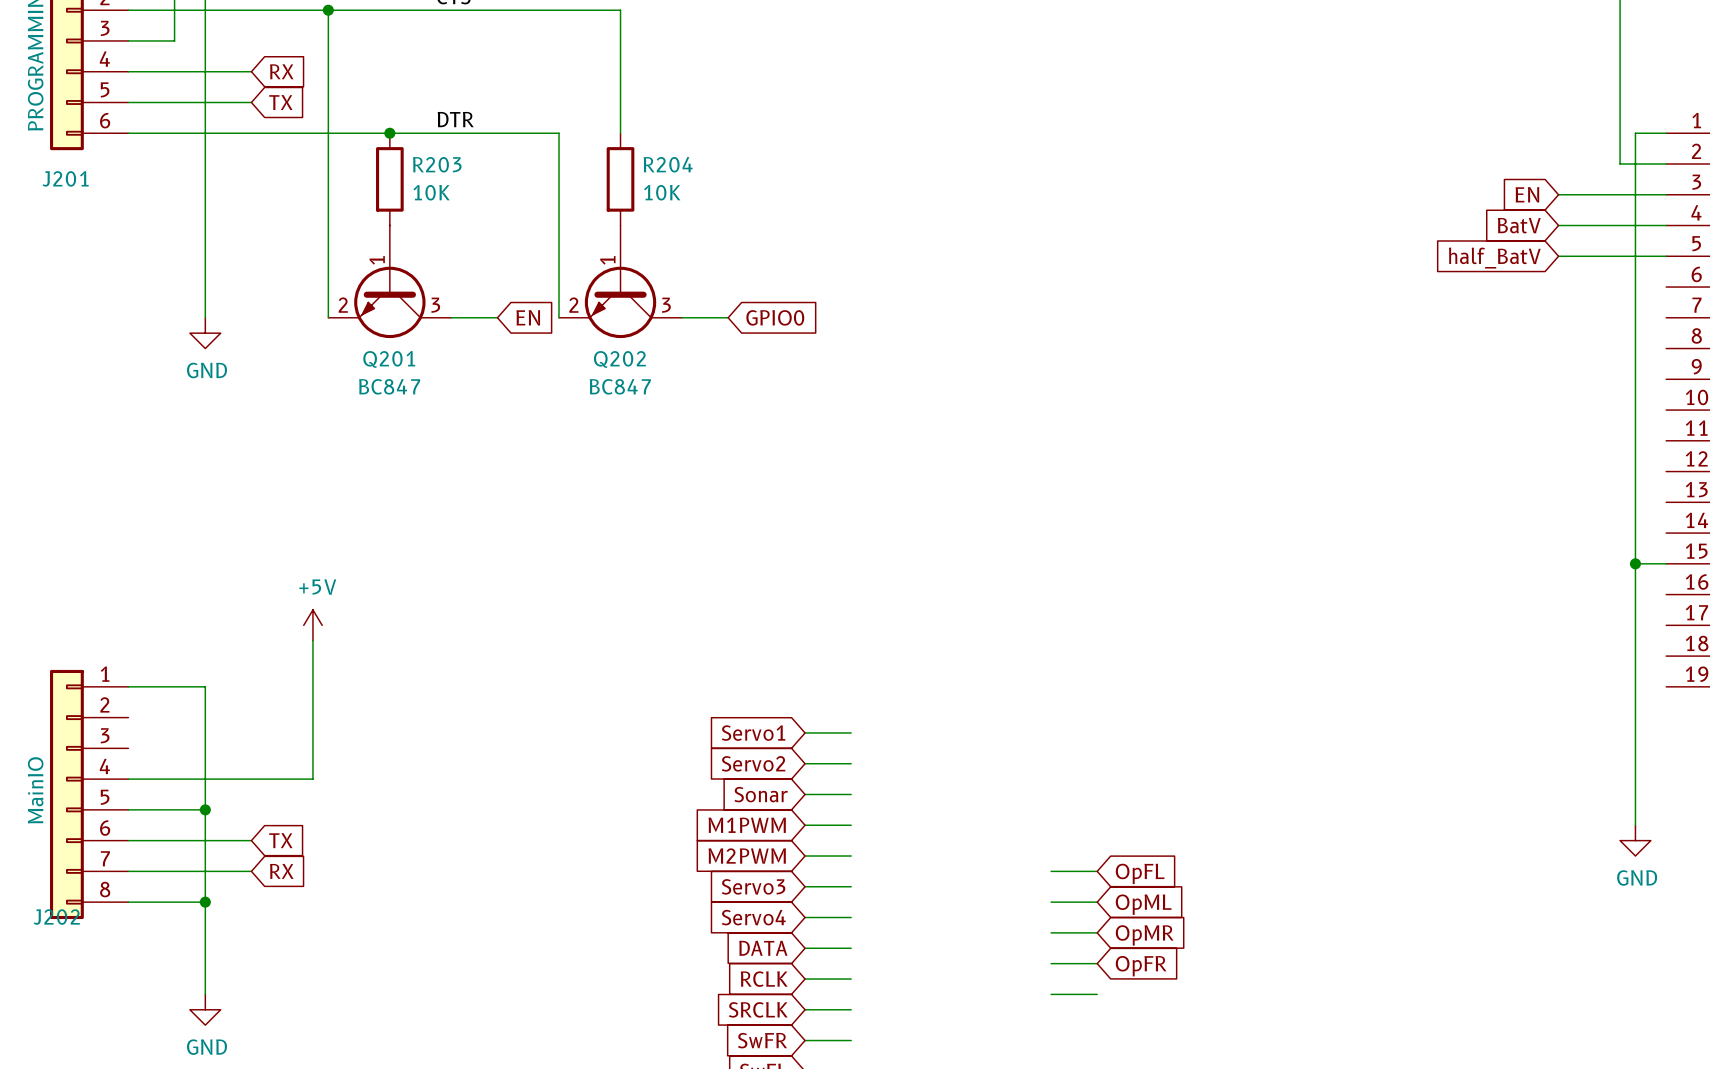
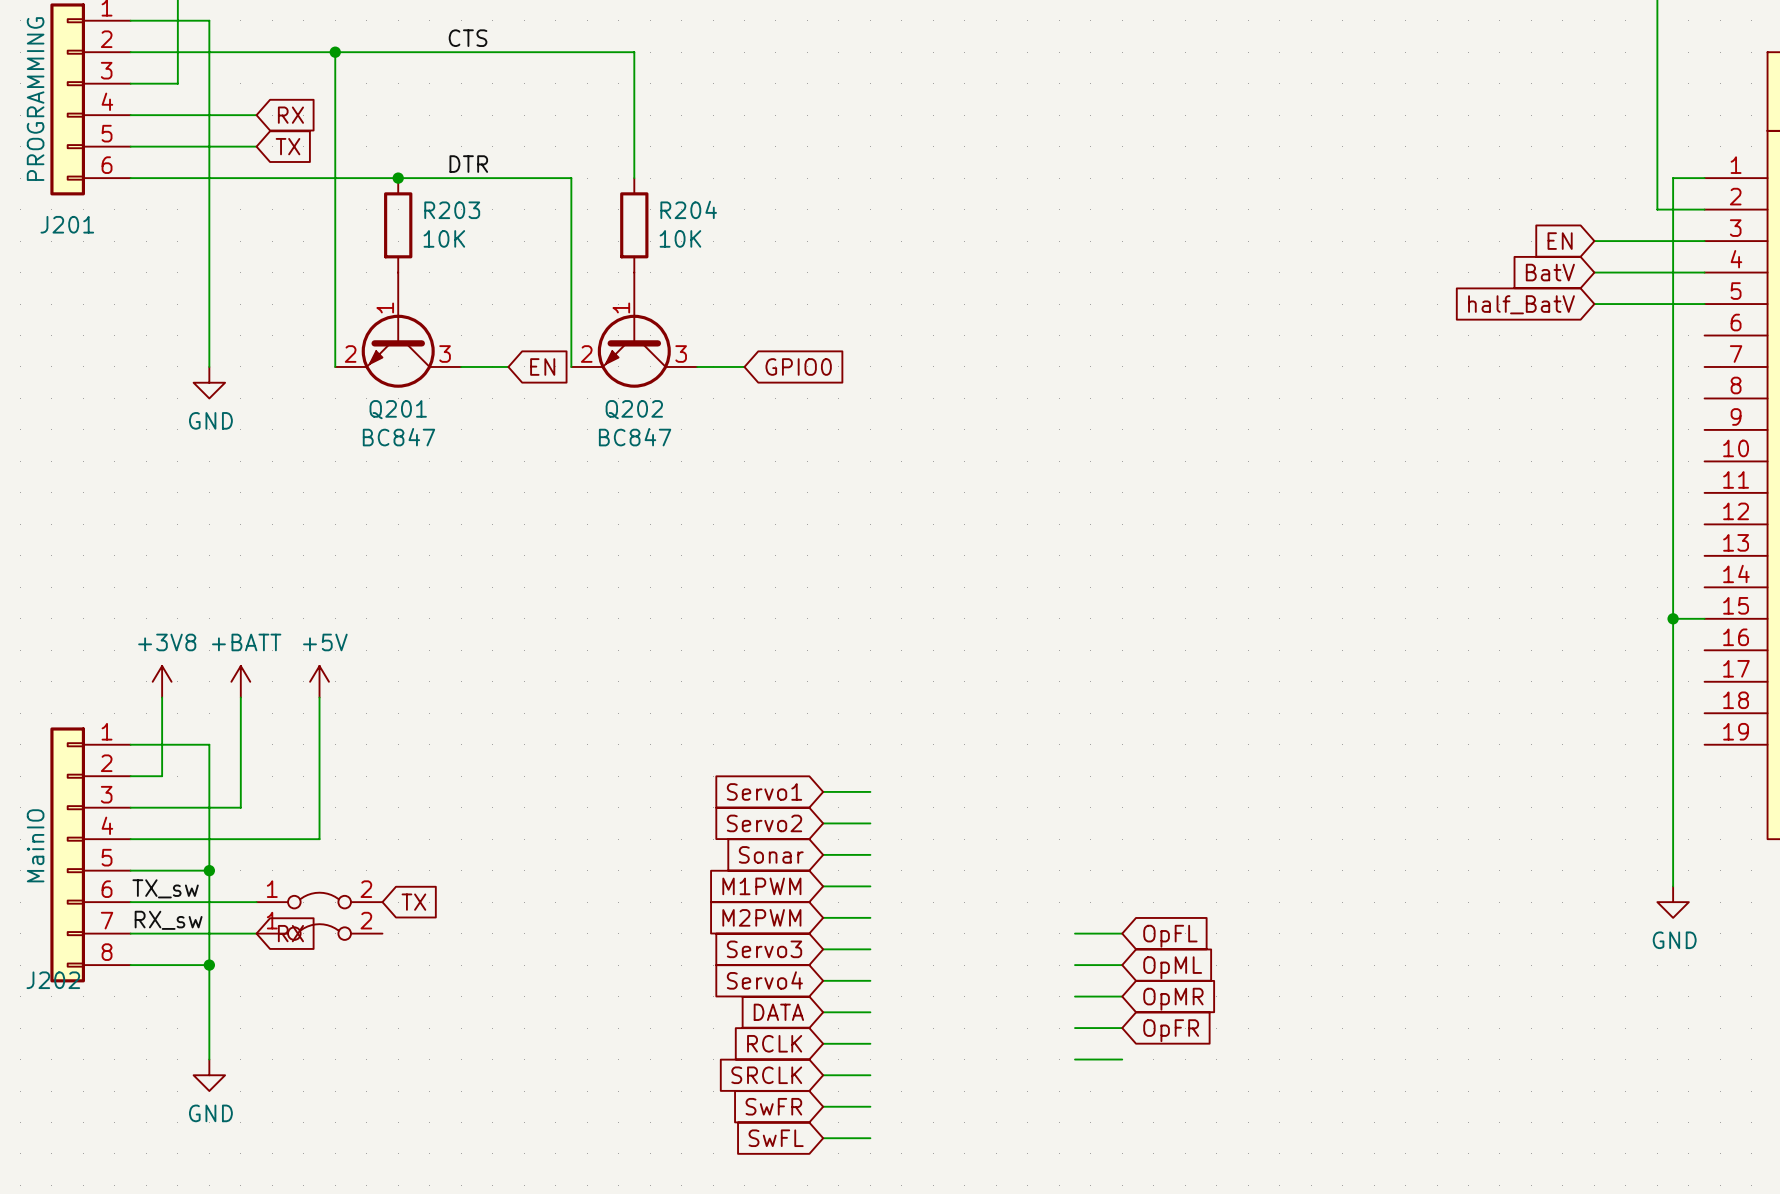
power symbol: none -> +3V8 (162, 681)
power symbol: none -> +BATT (240, 681)
wire: none -> (162, 697) (162, 776) (130, 776)
wire: none -> (240, 697) (240, 807) (130, 807)
label: none -> TX_sw (165, 888)
part: none -> (319, 900)
global label position: TX (280, 840) -> TX (413, 902)
label: none -> RX_sw (168, 920)
part: none -> (319, 932)

